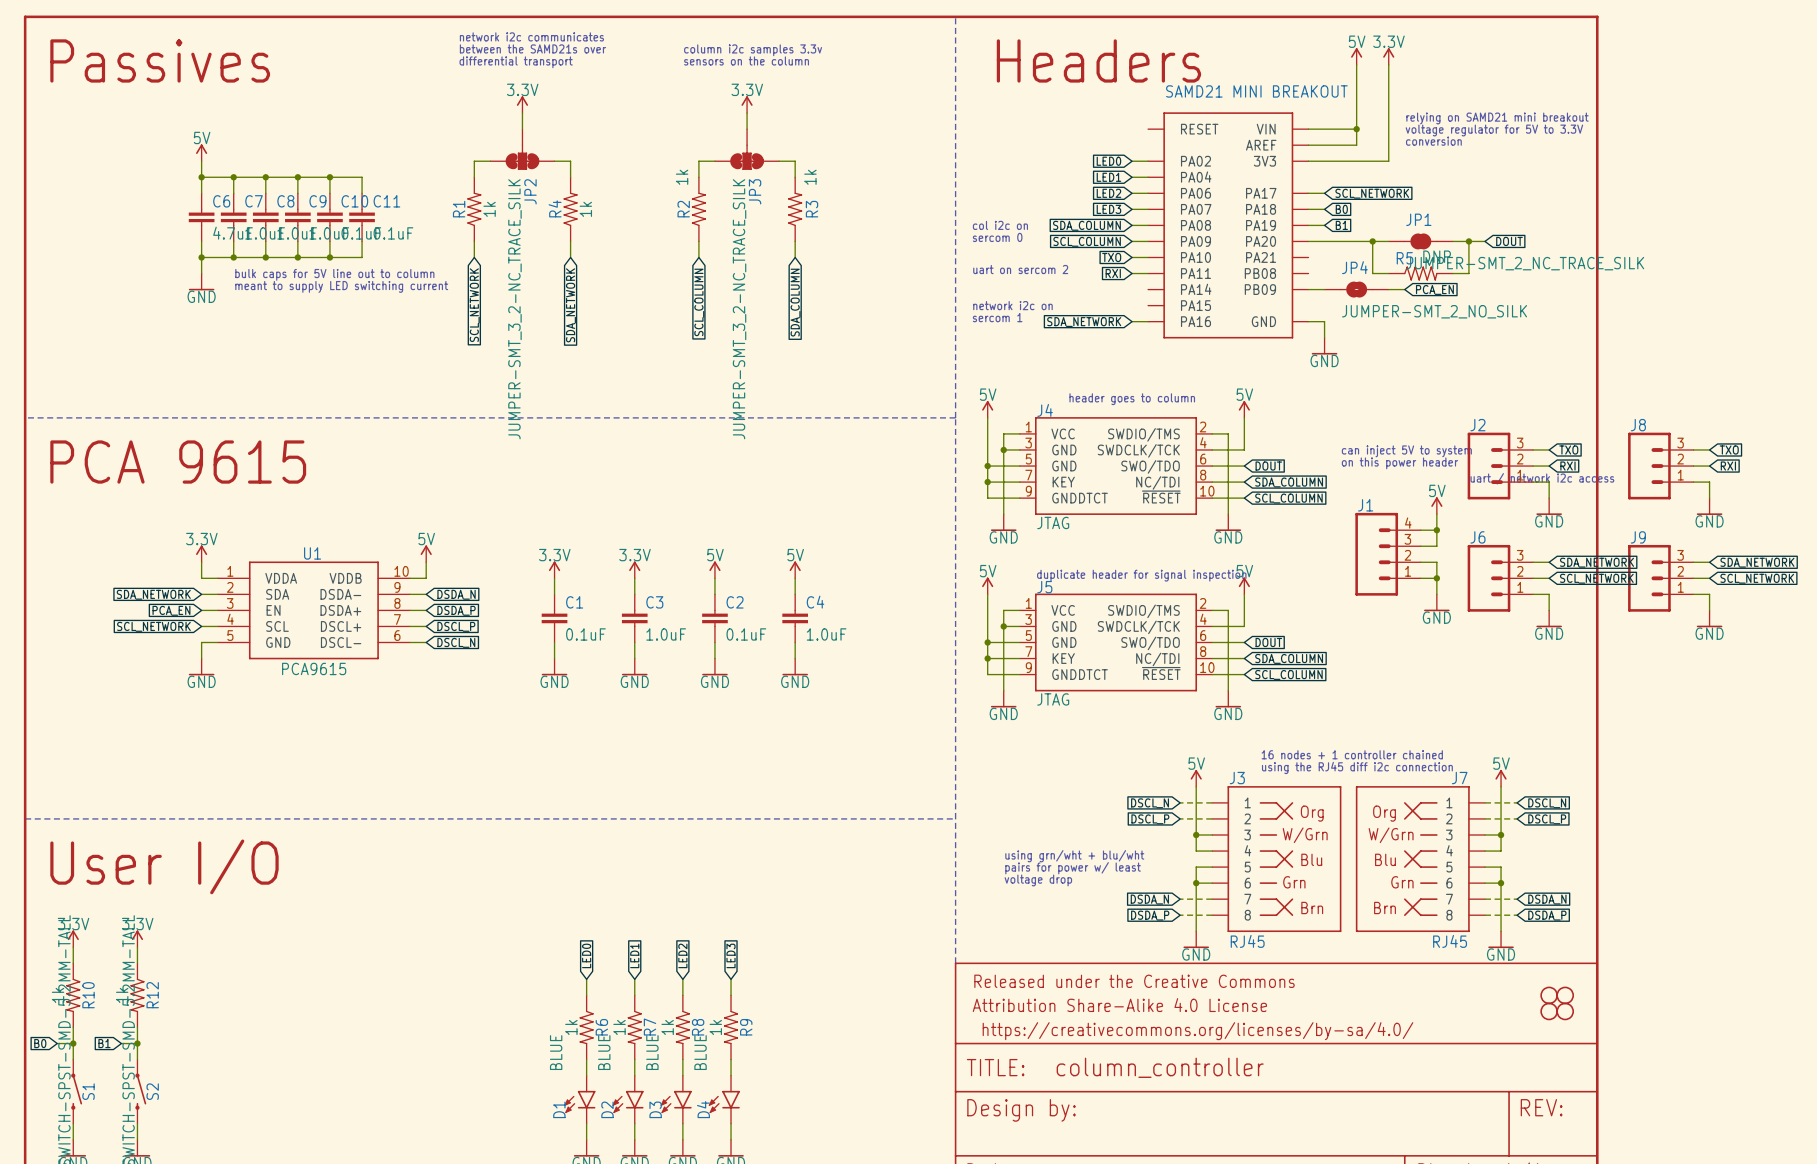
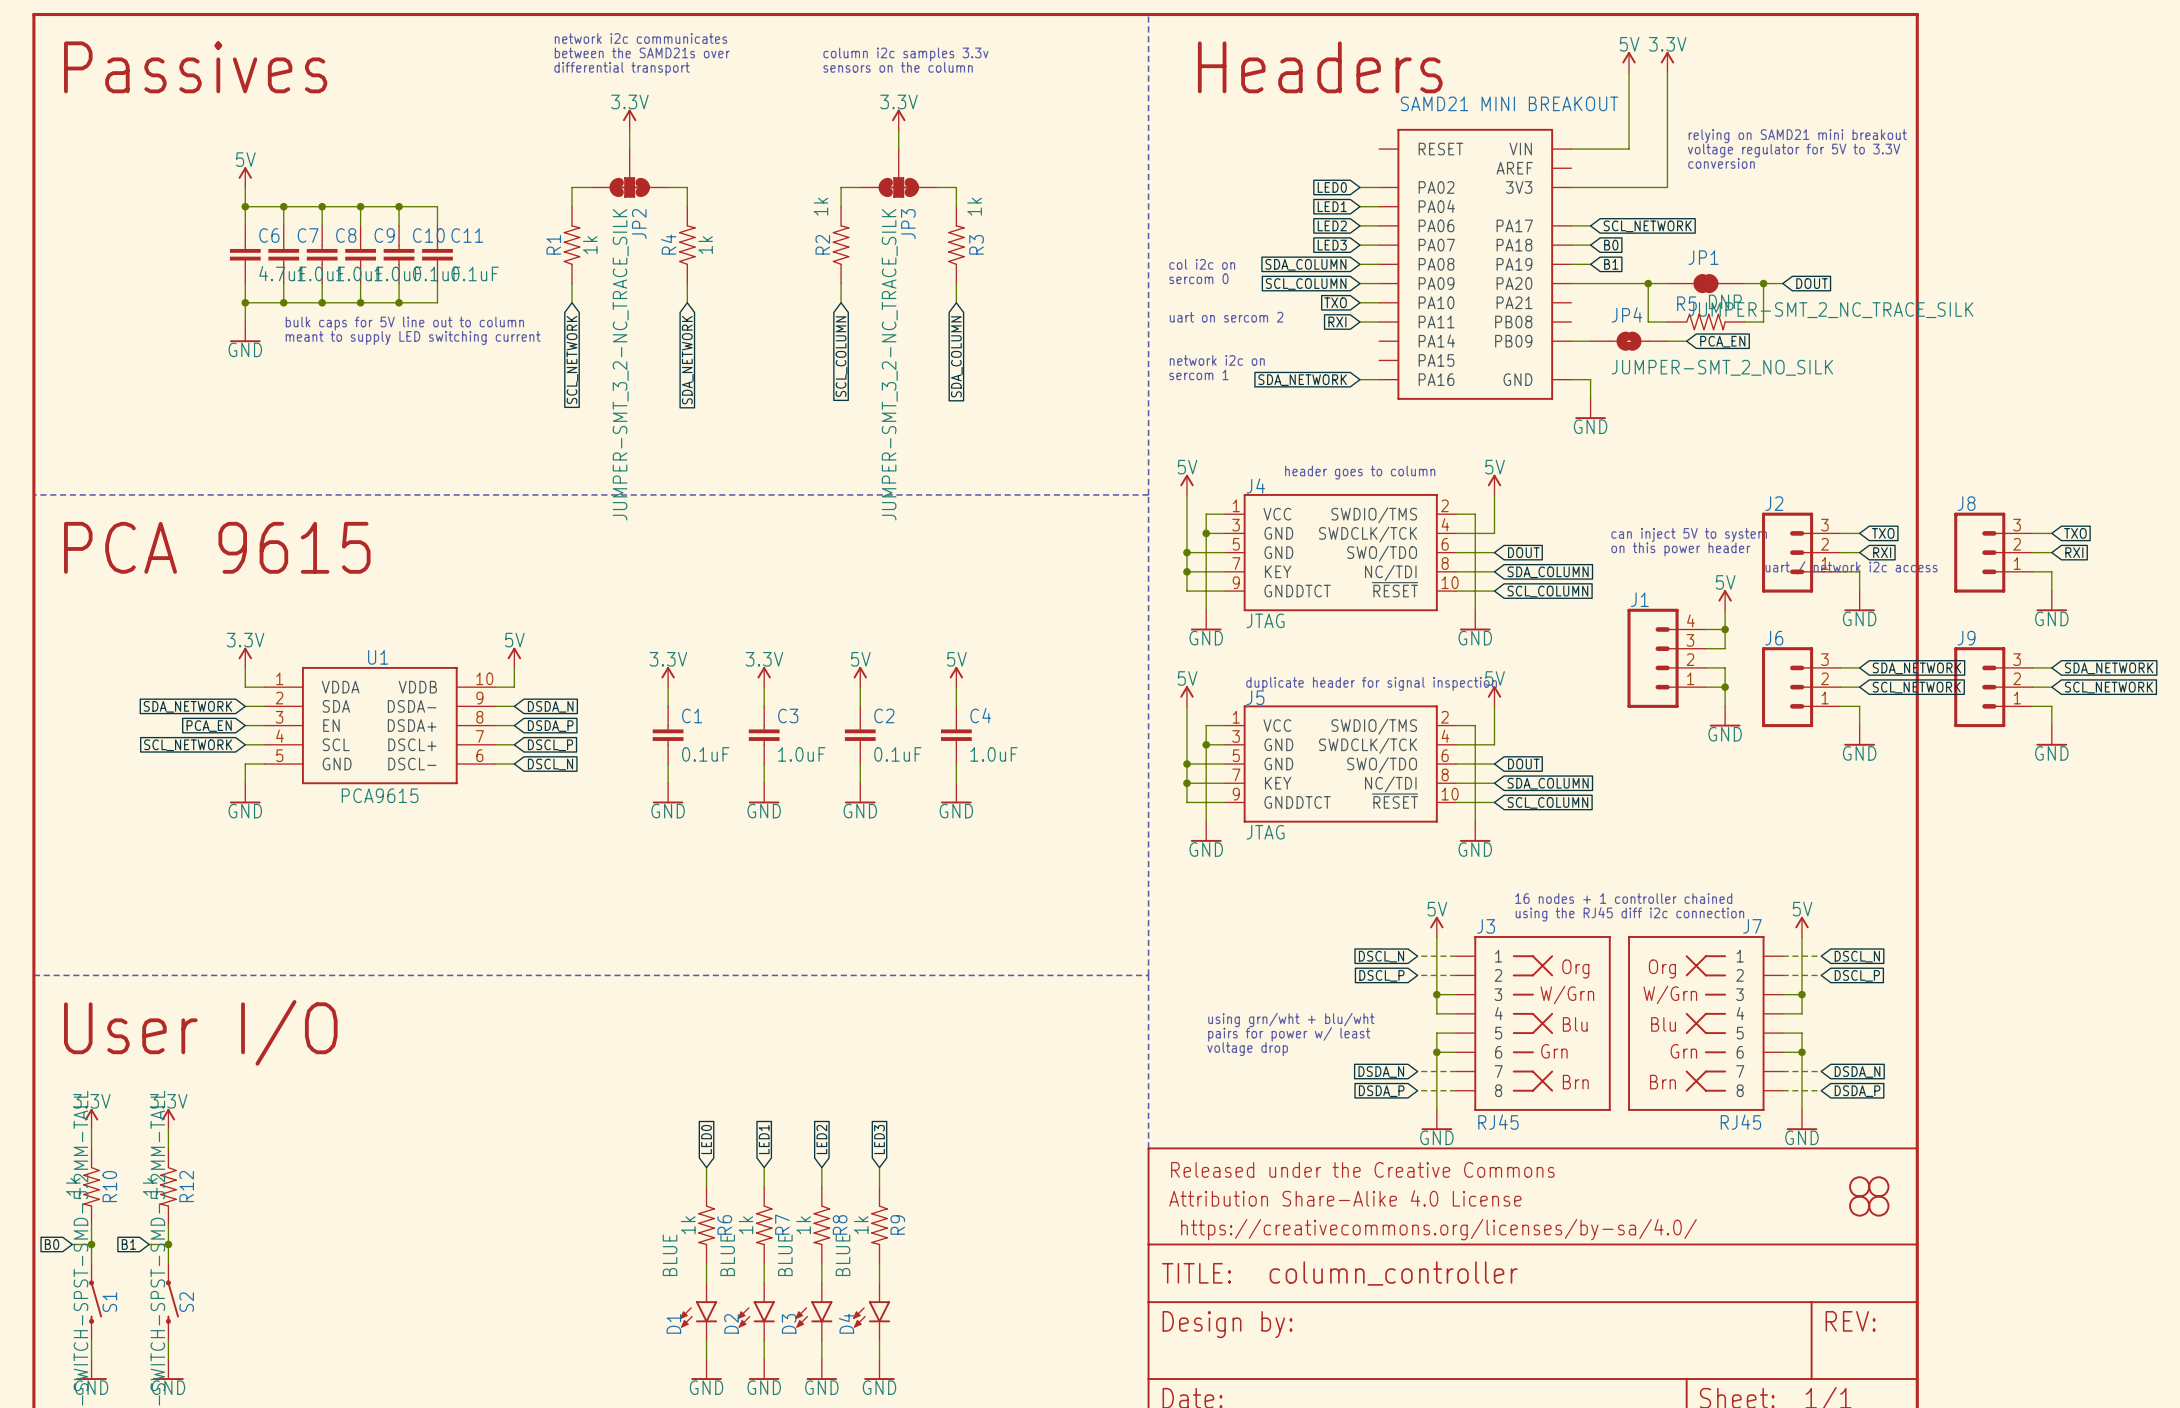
wire: (1356, 129) (1356, 145) (1308, 145) -> none
junction: (1356, 129) -> none

